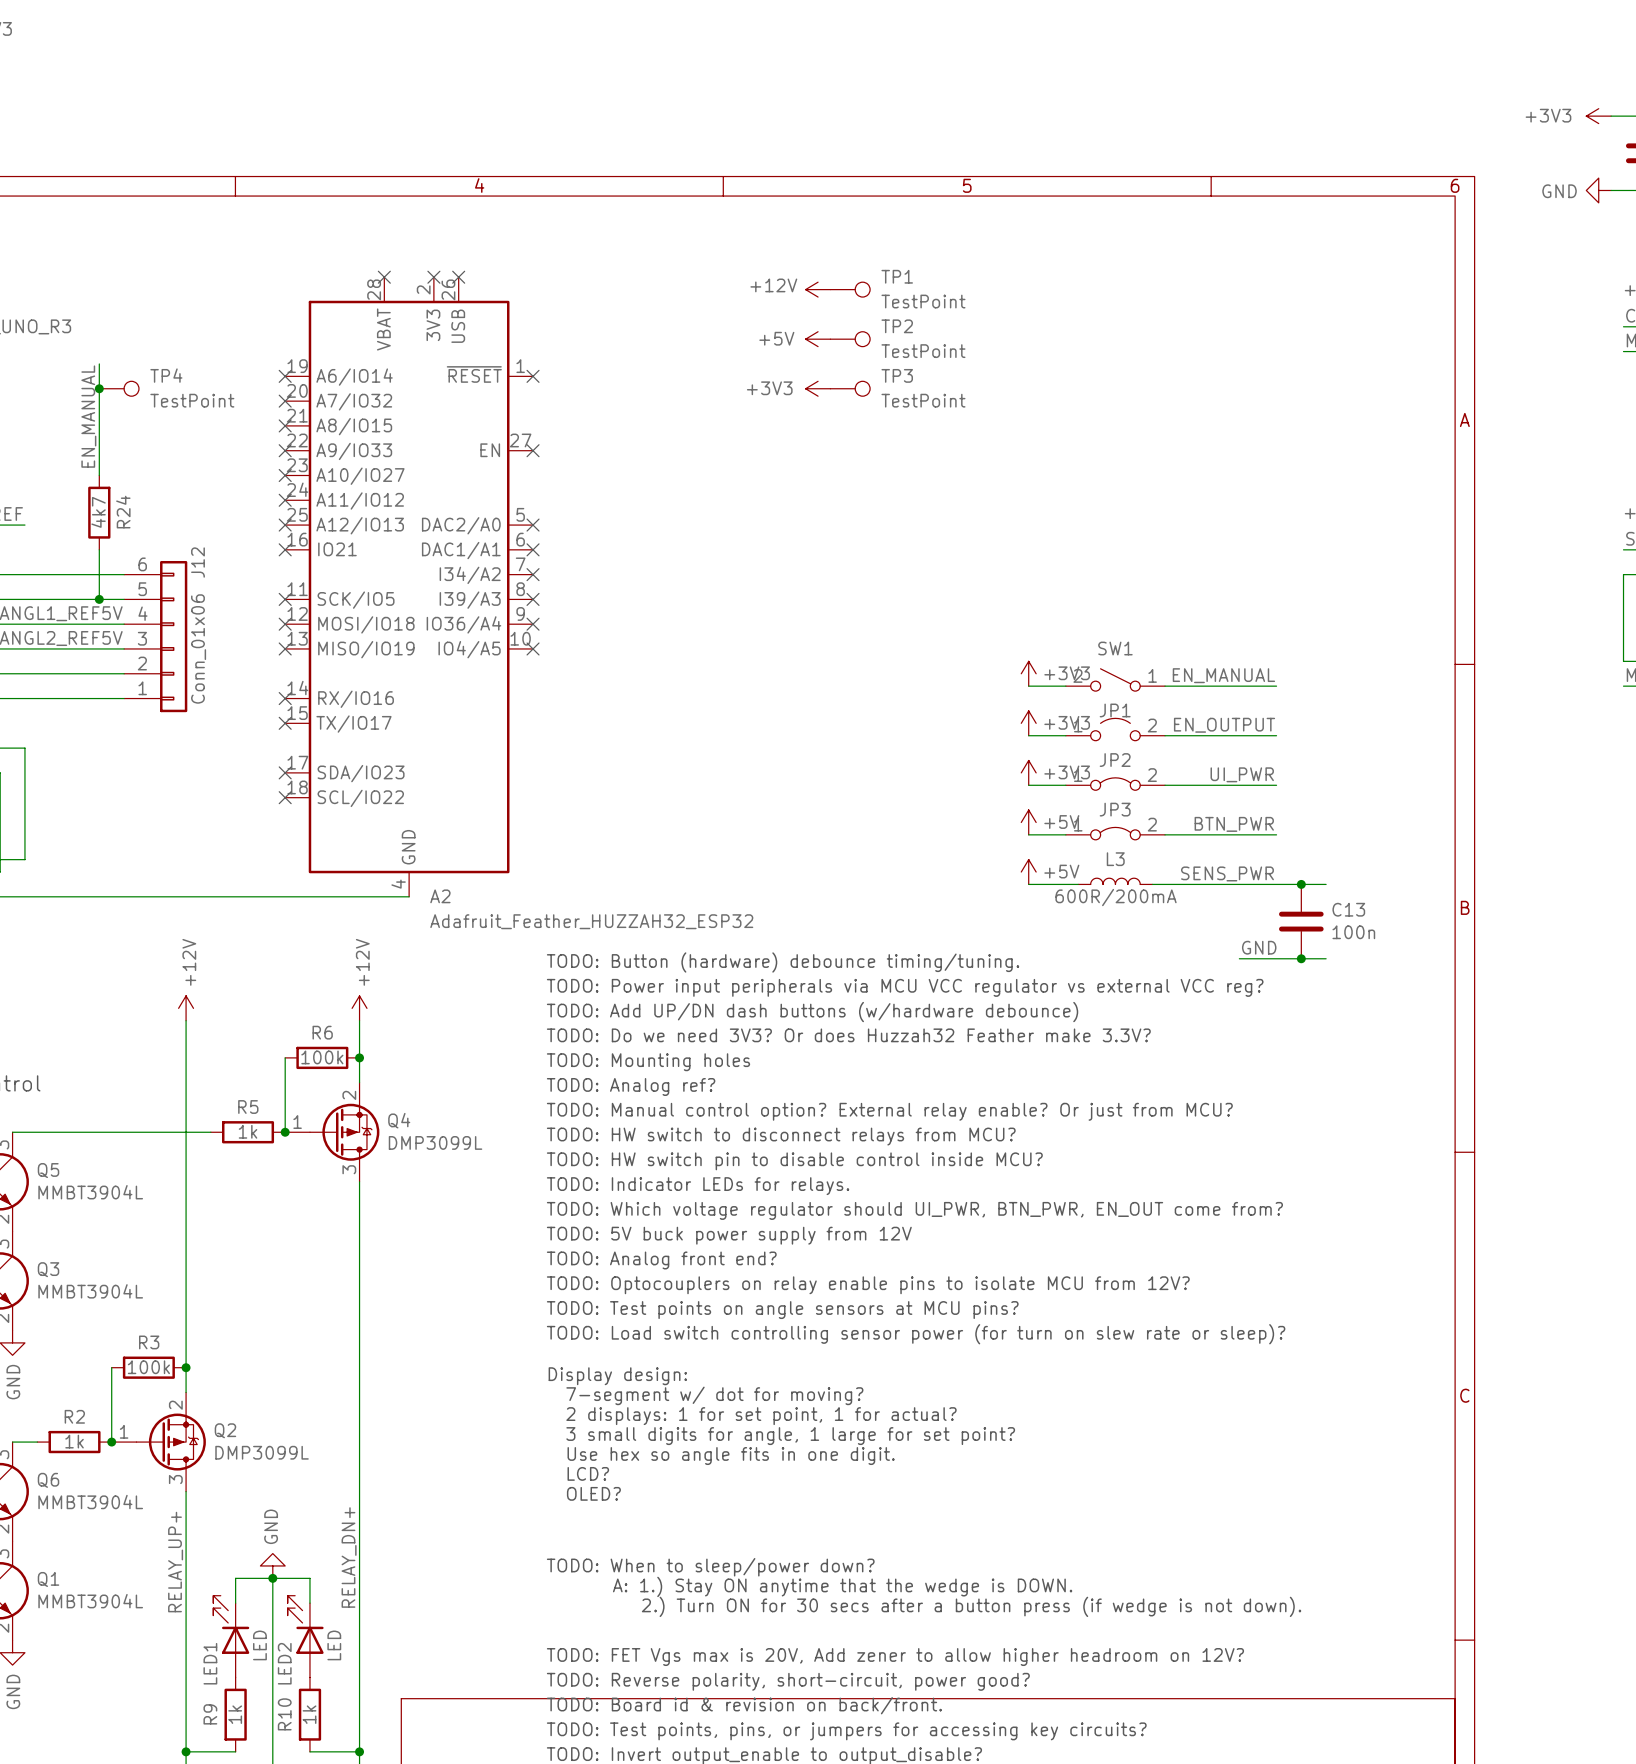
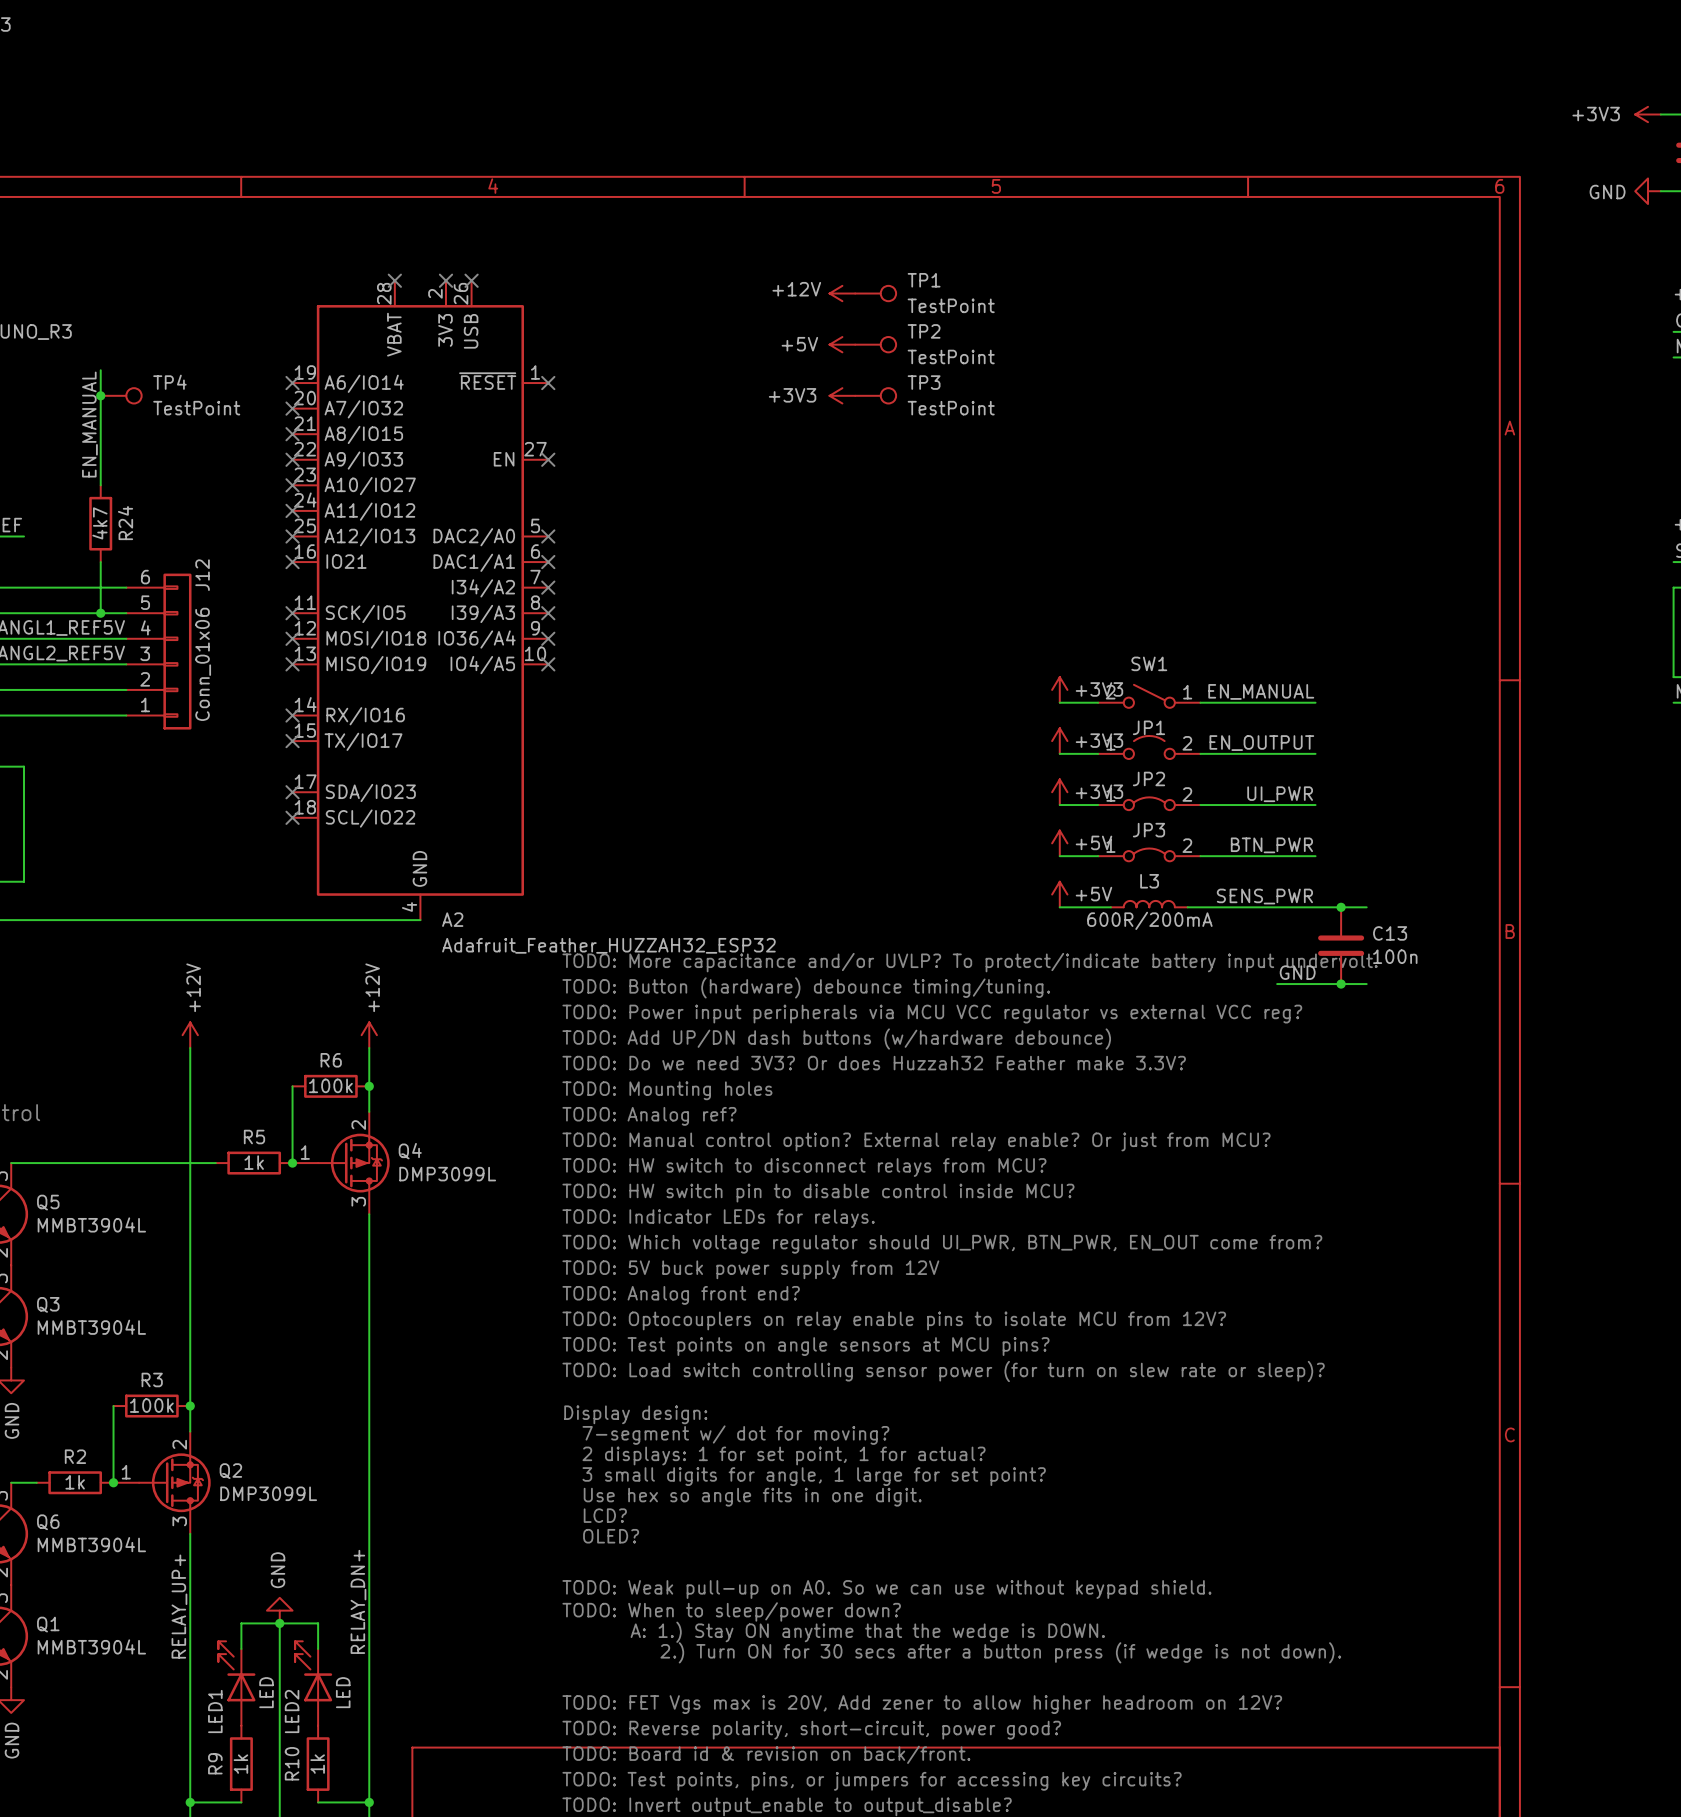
text: none -> TODO: More capacitance and/or UVLP? To protect/indicate battery input undervolt. (970, 962)
text: none -> TODO: Weak pull-up on A0. So we can use without keypad shield. (886, 1589)

